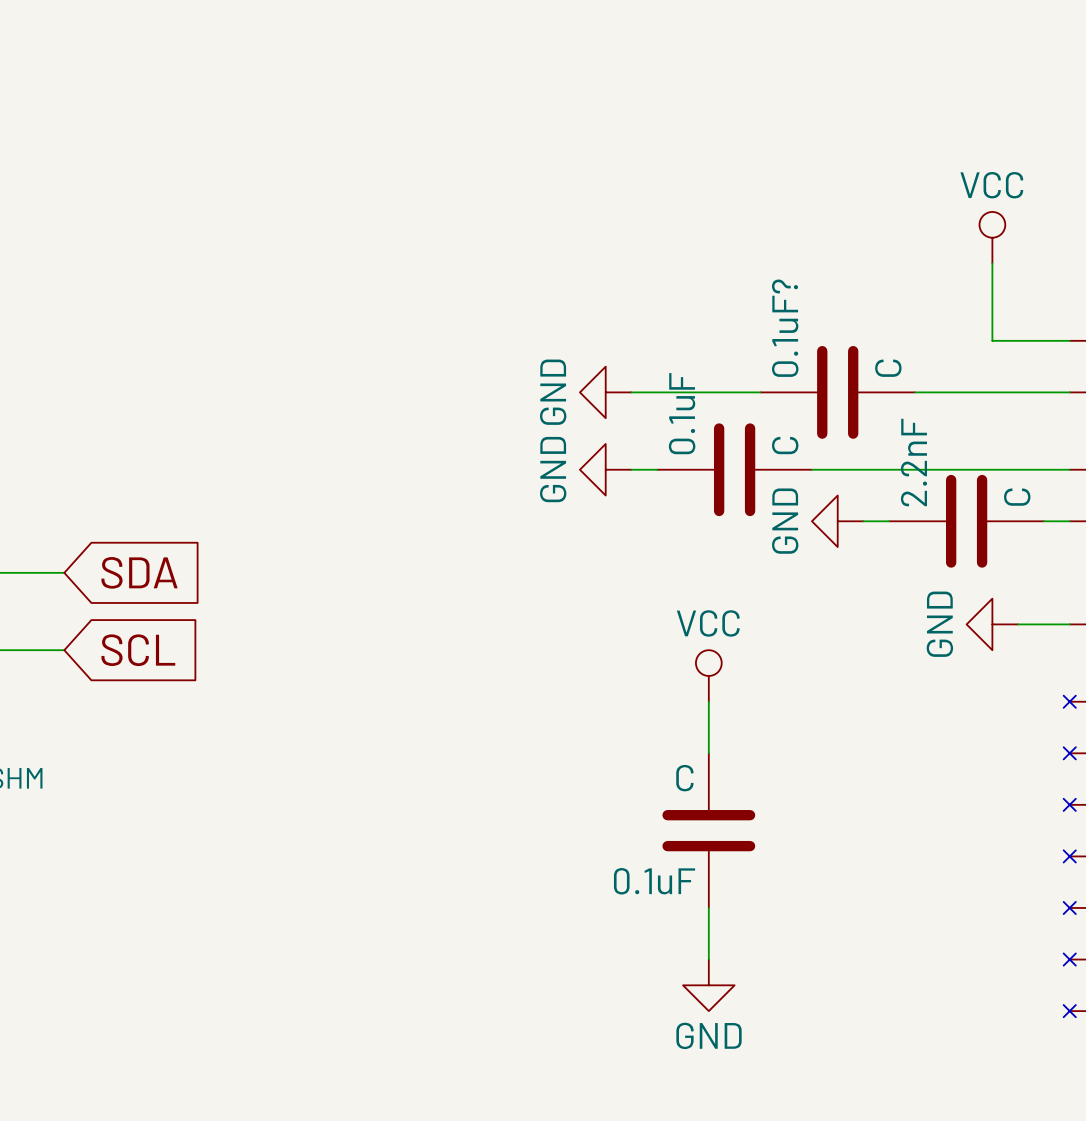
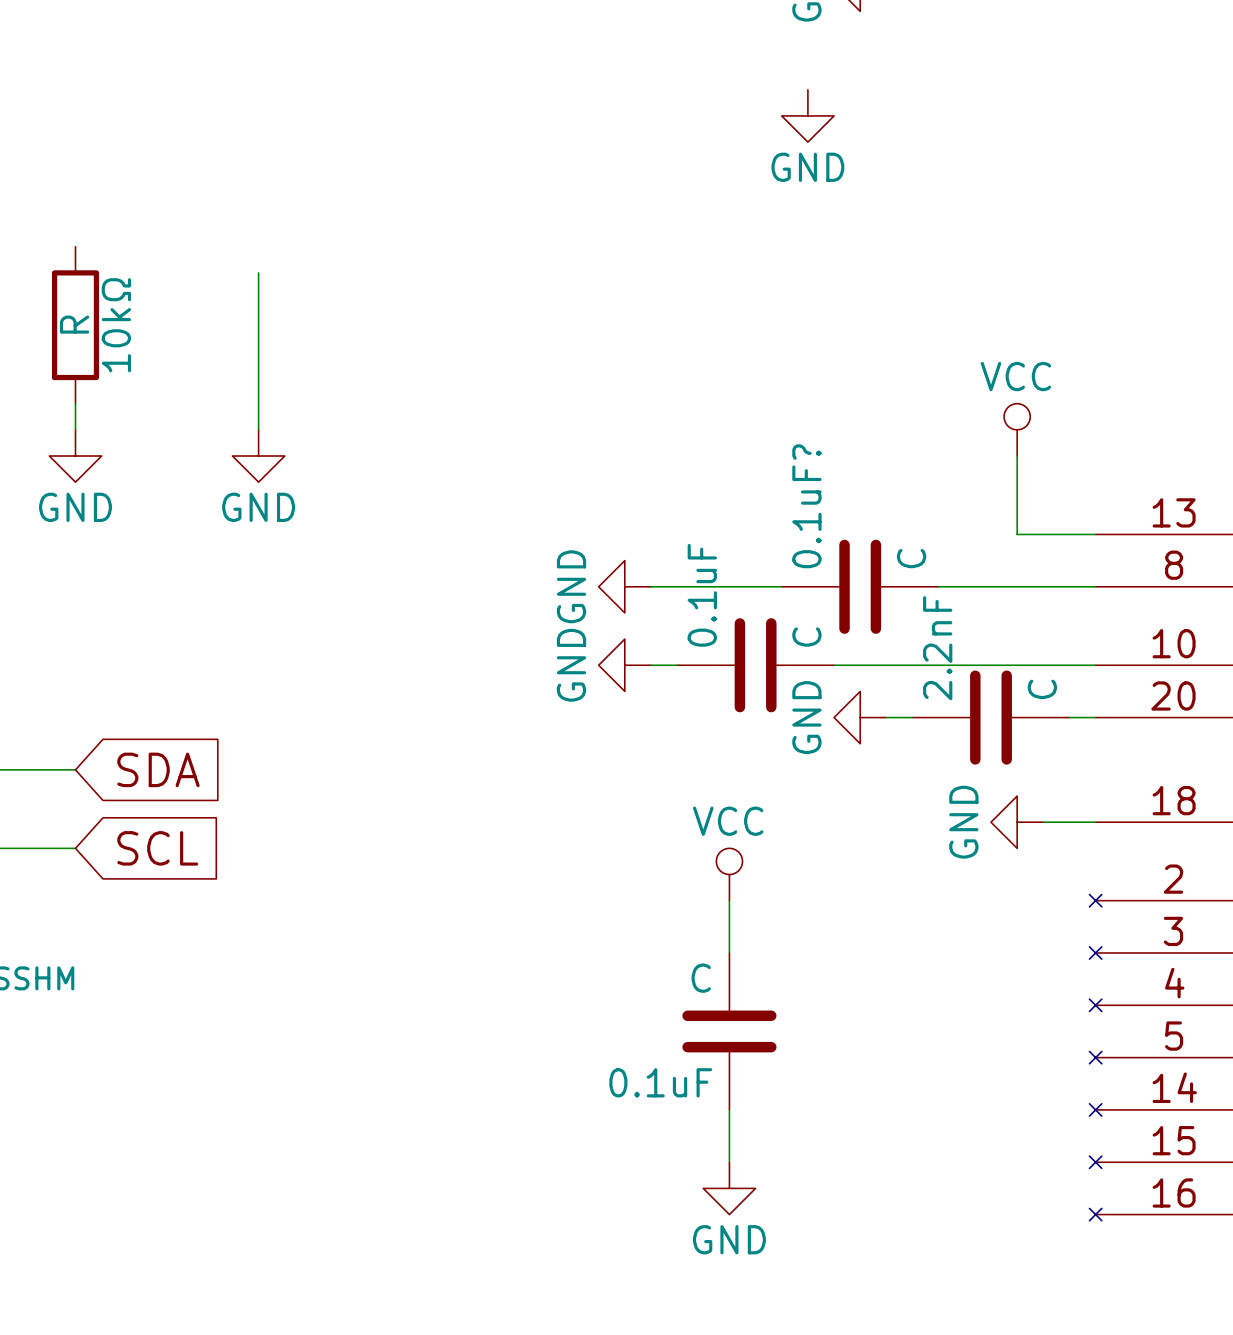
wire: none -> (258, 272) (258, 429)
10kΩ: none -> R (75, 325)
wire: none -> (75, 403) (75, 429)
power symbol: none -> GND (75, 456)
power symbol: none -> GND (258, 456)

